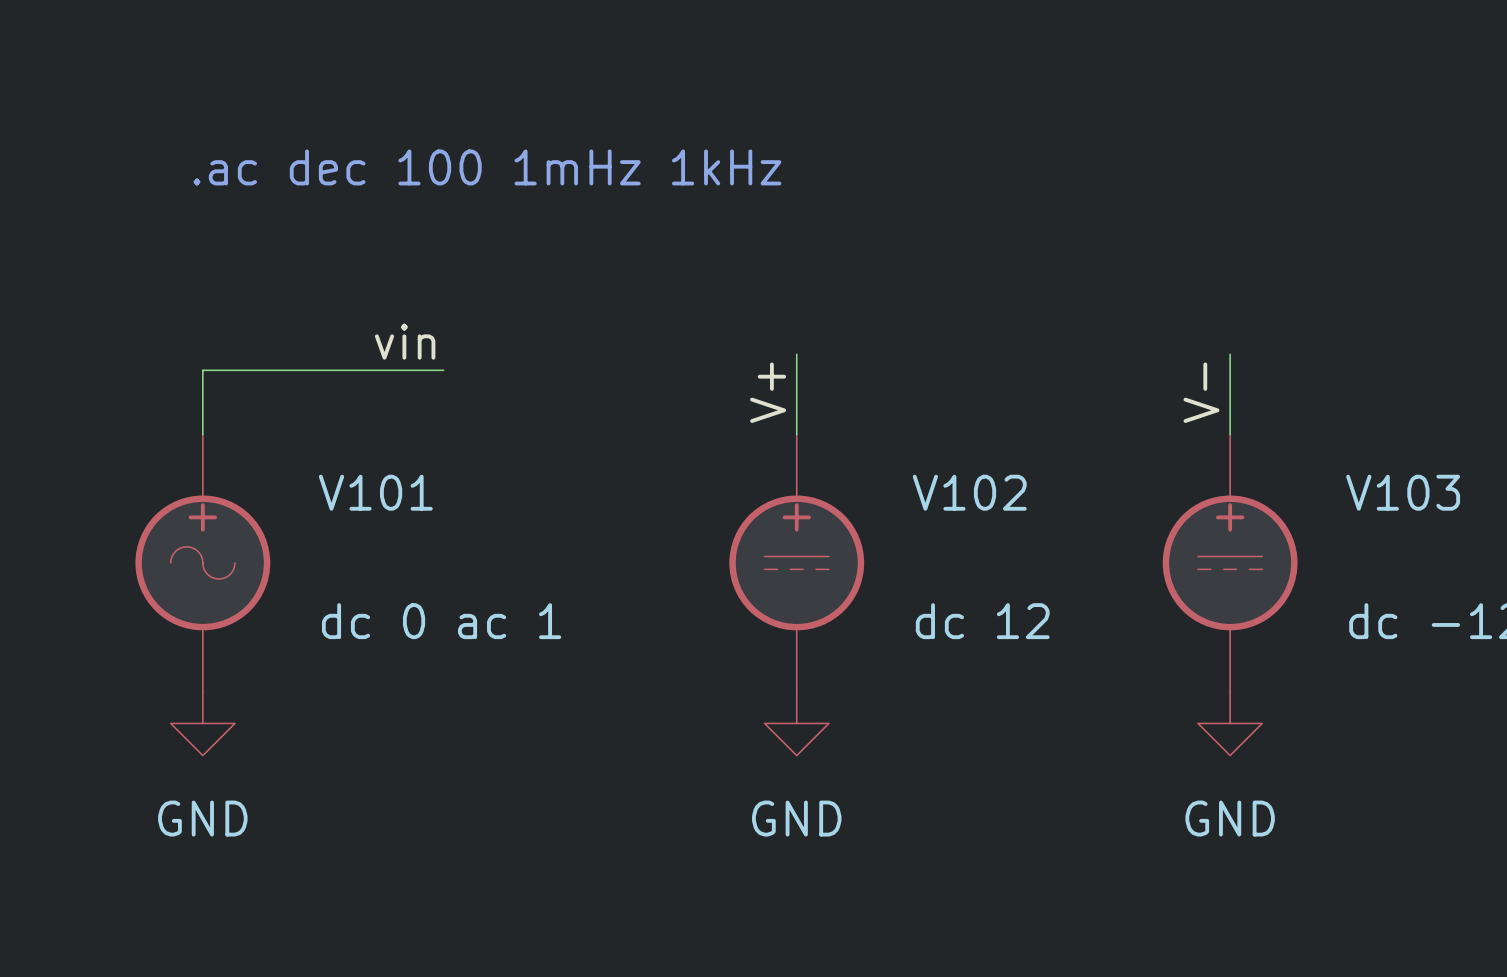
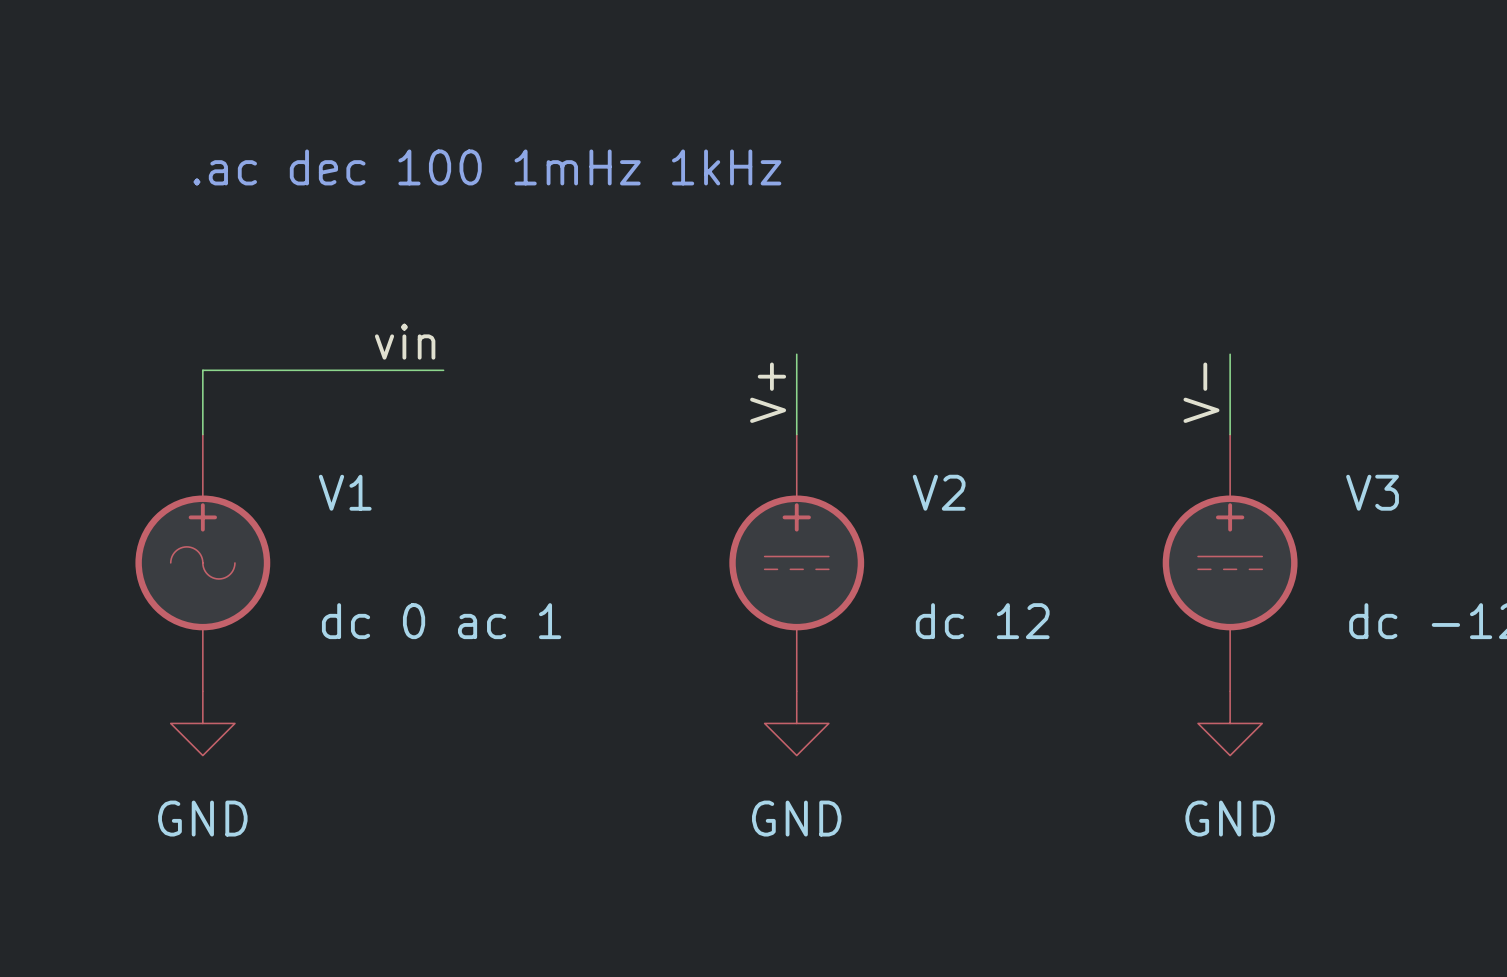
V101 name: V101 (375, 492) -> V1 (345, 492)
V102 name: V102 (969, 492) -> V2 (939, 492)
V103 name: V103 (1403, 492) -> V3 (1372, 492)

